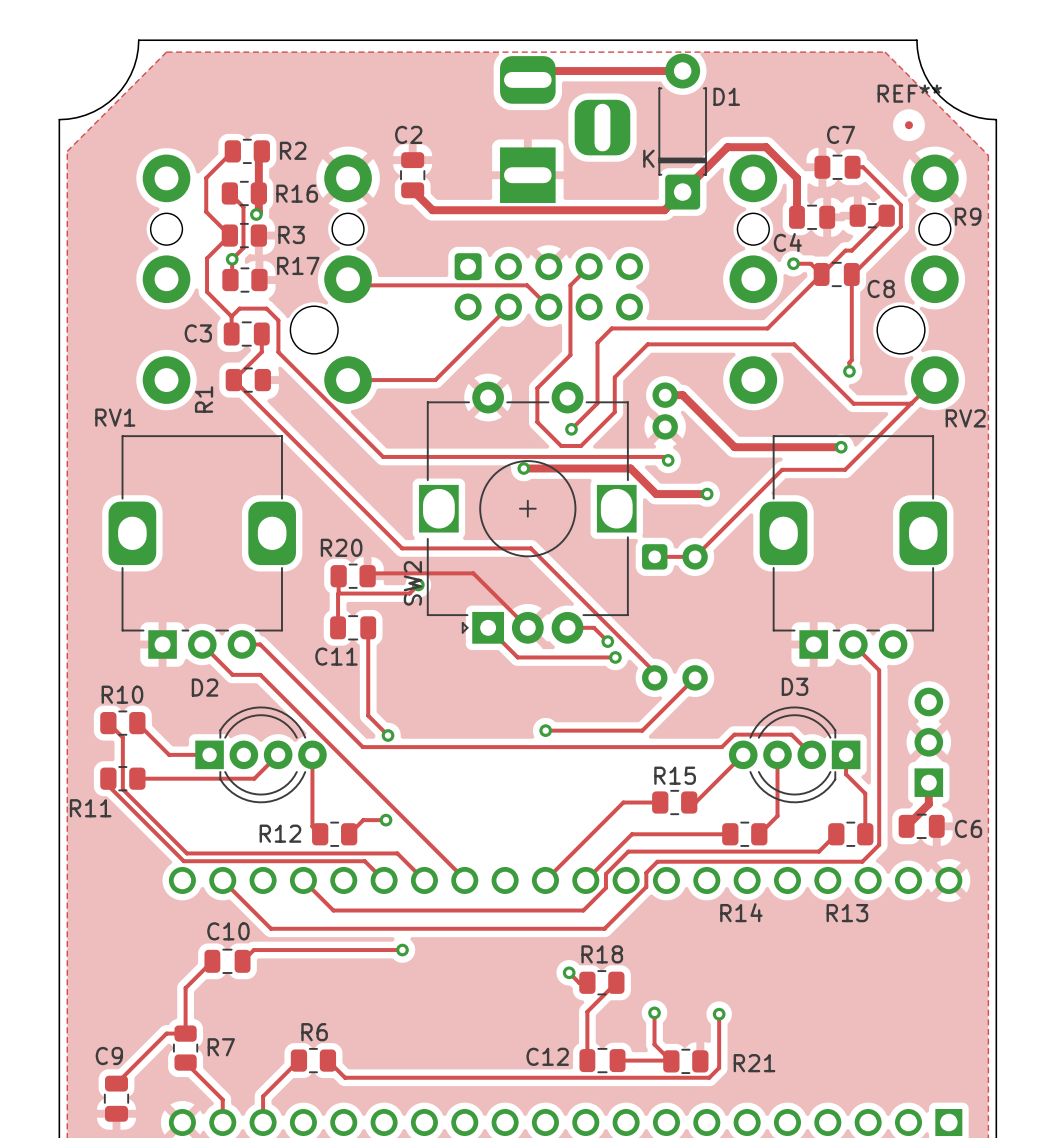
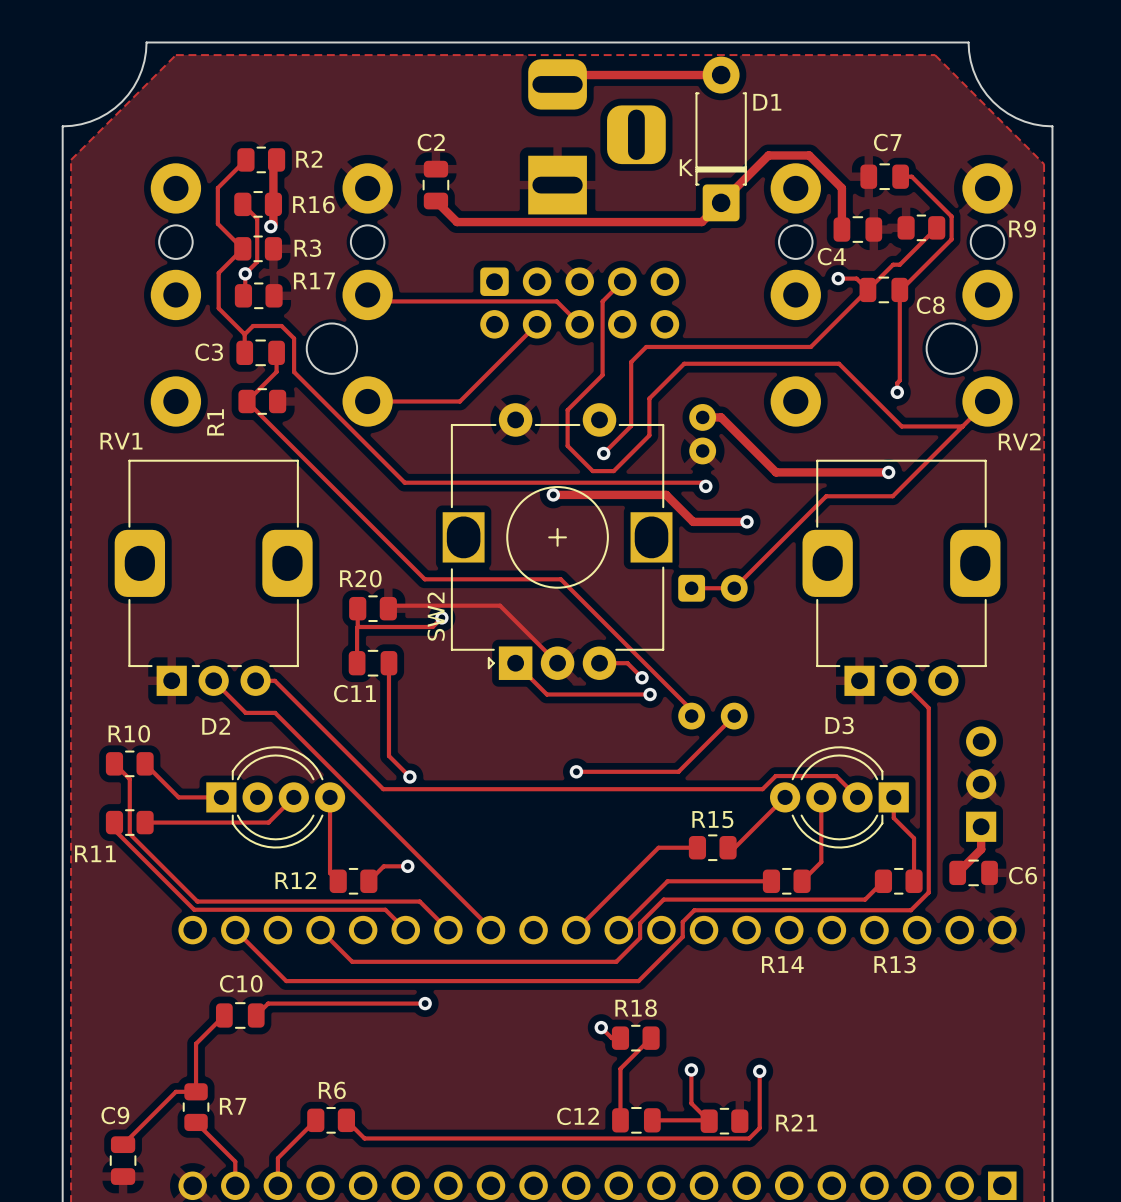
REF**: (908, 125) -> none

